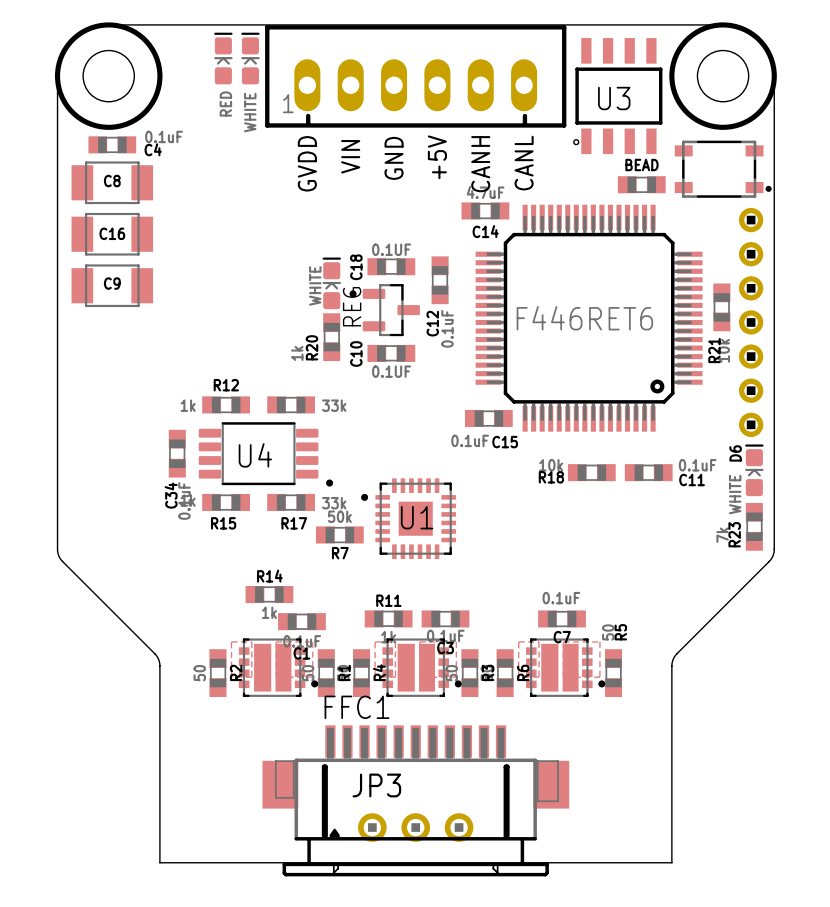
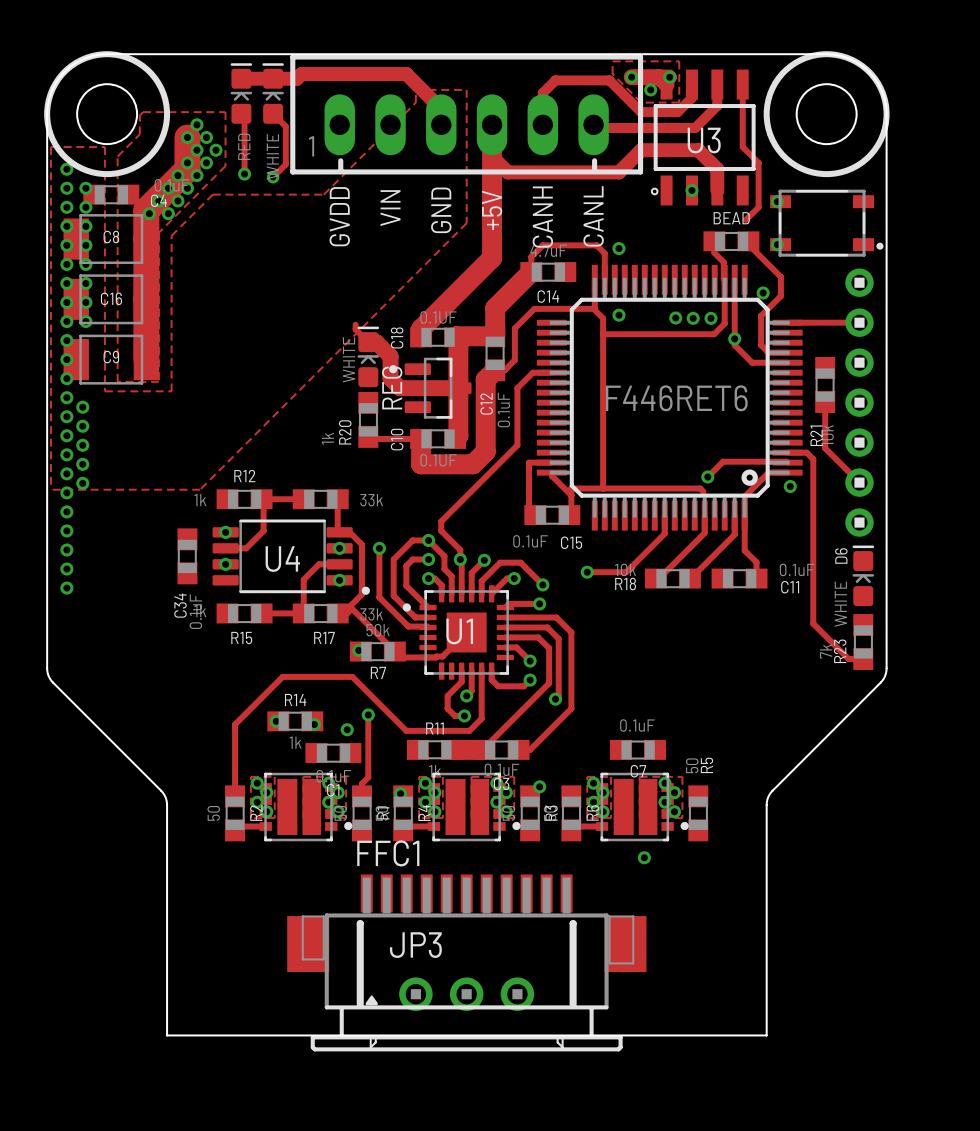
zone outline: none -> (612, 61) (679, 61) (679, 102) (641, 102) (612, 74) (612, 61)
track: none -> (631, 77) (659, 77) (666, 84) (666, 80) (669, 77) (631, 77)
via: none -> (631, 77)
via: none -> (669, 77)
track: none -> (241, 78) (296, 78) (301, 74) (406, 74) (441, 108) (441, 124)
track: none -> (691, 84) (691, 97) (677, 112) (641, 112) (609, 80) (555, 80) (542, 93) (542, 124)
track: none -> (717, 84) (717, 105) (695, 127) (596, 127) (593, 124)
track: none -> (742, 84) (742, 147) (758, 162) (758, 207) (745, 220)
zone outline: none -> (415, 89) (466, 89) (466, 223) (200, 489) (51, 489) (51, 147) (104, 147) (104, 391) (171, 391) (171, 235) (212, 194) (323, 194) (415, 102) (415, 89)
via: none -> (650, 89)
zone outline: none -> (143, 112) (225, 112) (225, 166) (158, 232) (158, 381) (117, 381) (117, 156) (139, 134) (139, 115) (143, 112)
track: none -> (241, 113) (244, 116) (244, 174)
track: none -> (273, 113) (285, 126) (285, 164) (273, 177)
via: none -> (196, 124)
track: none -> (187, 137) (187, 169) (146, 210) (146, 359)
via: none -> (187, 137)
via: none -> (206, 137)
via: none -> (196, 150)
via: none -> (216, 150)
via: none -> (187, 162)
via: none -> (206, 162)
via: none -> (66, 169)
via: none -> (244, 174)
via: none -> (177, 175)
via: none -> (196, 175)
via: none -> (273, 177)
via: none -> (66, 188)
via: none -> (85, 188)
via: none -> (168, 188)
via: none -> (187, 188)
via: none -> (691, 190)
track: none -> (717, 190) (717, 169) (698, 150) (641, 150) (618, 172) (507, 172) (492, 156) (492, 124) (492, 258) (421, 329) (421, 337)
via: none -> (158, 200)
via: none -> (177, 200)
via: none -> (777, 201)
via: none -> (66, 207)
via: none -> (85, 207)
via: none -> (149, 213)
via: none -> (168, 213)
via: none -> (66, 226)
via: none -> (85, 226)
track: none -> (714, 241) (714, 252) (723, 262) (724, 323) (714, 334) (603, 334)
track: none -> (748, 241) (748, 244) (780, 277) (780, 296) (761, 315) (761, 345) (768, 352) (787, 352)
via: none -> (777, 244)
via: none -> (66, 245)
via: none -> (85, 245)
via: none -> (618, 248)
via: none -> (66, 264)
via: none -> (85, 264)
track: none -> (594, 279) (594, 308) (534, 308) (514, 328) (514, 360) (504, 370) (495, 370) (485, 379) (485, 451) (473, 464) (421, 464) (421, 438) (370, 438) (368, 436)
track: none -> (604, 279) (604, 253) (596, 245) (542, 245) (531, 256) (531, 272) (495, 308) (495, 336) (455, 337) (458, 340) (458, 435) (455, 438)
track: none -> (734, 279) (734, 345) (752, 362) (787, 362)
via: none -> (66, 283)
via: none -> (85, 283)
via: none -> (763, 292)
via: none -> (66, 302)
via: none -> (85, 302)
track: none -> (594, 310) (603, 318) (603, 488)
via: none -> (618, 315)
via: none -> (675, 318)
via: none -> (693, 318)
via: none -> (710, 318)
via: none -> (66, 321)
via: none -> (85, 321)
track: none -> (789, 322) (859, 322)
track: none -> (355, 324) (355, 329) (368, 342) (376, 342) (390, 356) (390, 378) (400, 388) (458, 388)
via: none -> (734, 338)
via: none -> (66, 340)
via: none -> (66, 359)
track: none -> (551, 372) (532, 372) (517, 388) (517, 445) (441, 521) (441, 530) (460, 549) (461, 593)
via: none -> (66, 378)
via: none -> (66, 397)
track: none -> (825, 401) (825, 448) (859, 482)
via: none -> (82, 407)
via: none -> (66, 416)
via: none -> (82, 426)
via: none -> (66, 435)
via: none -> (82, 445)
track: none -> (787, 452) (806, 452) (813, 459) (813, 623) (848, 659) (863, 659)
via: none -> (66, 454)
track: none -> (551, 462) (529, 462) (529, 508) (535, 515)
track: none -> (787, 462) (723, 461) (707, 477)
via: none -> (82, 464)
track: none -> (551, 472) (551, 475) (571, 495)
track: none -> (787, 472) (768, 472) (744, 496) (744, 550) (756, 562) (756, 578)
via: none -> (66, 473)
via: none -> (707, 477)
via: none -> (82, 483)
via: none -> (790, 486)
track: none -> (703, 491) (700, 488) (571, 488) (571, 513) (569, 515)
via: none -> (66, 492)
track: none -> (261, 499) (303, 499)
track: none -> (263, 499) (263, 530) (246, 548) (225, 548)
track: none -> (337, 499) (337, 530) (339, 532) (349, 532) (361, 544) (361, 594) (342, 613)
via: none -> (66, 511)
track: none -> (664, 515) (664, 533) (626, 572) (587, 572)
track: none -> (704, 515) (704, 532) (659, 578) (655, 578)
track: none -> (734, 515) (734, 534) (690, 578)
via: none -> (66, 530)
via: none -> (225, 532)
via: none -> (428, 540)
via: none -> (339, 548)
track: none -> (379, 548) (379, 597) (408, 626) (428, 627)
via: none -> (379, 548)
via: none -> (66, 549)
track: none -> (428, 559) (412, 559) (406, 565) (406, 585) (428, 607)
via: none -> (428, 559)
via: none -> (460, 559)
track: none -> (484, 560) (471, 573) (471, 593)
via: none -> (484, 560)
via: none -> (225, 564)
track: none -> (339, 564) (319, 564) (303, 579) (303, 613) (261, 613)
via: none -> (66, 569)
via: none -> (587, 572)
track: none -> (428, 578) (434, 578) (441, 585) (441, 593)
via: none -> (428, 578)
track: none -> (514, 578) (506, 578) (491, 593)
via: none -> (514, 578)
via: none -> (339, 580)
track: none -> (542, 584) (520, 562) (500, 562) (481, 581) (481, 593)
via: none -> (542, 584)
via: none -> (66, 588)
track: none -> (451, 593) (451, 576) (444, 569) (444, 556) (428, 540) (412, 540) (393, 559) (393, 595) (415, 617) (428, 617)
track: none -> (539, 603) (508, 603) (505, 607)
via: none -> (539, 603)
track: none -> (337, 613) (347, 613) (351, 608) (400, 657) (442, 656) (466, 632)
track: none -> (505, 617) (556, 617) (571, 632) (571, 708) (530, 749) (518, 749)
track: none -> (505, 627) (547, 627) (558, 638) (558, 695) (555, 699)
track: none -> (505, 637) (538, 637) (549, 648) (549, 683) (482, 749) (451, 749) (484, 749)
track: none -> (505, 647) (516, 647) (530, 661)
via: none -> (358, 650)
via: none -> (530, 661)
track: none -> (461, 671) (461, 681) (447, 695) (447, 708) (454, 715) (464, 715)
track: none -> (471, 671) (471, 690) (466, 695)
track: none -> (481, 671) (481, 718) (469, 730) (406, 730) (352, 676) (282, 676) (235, 724) (235, 796)
track: none -> (491, 671) (491, 679) (498, 686) (523, 686) (530, 680)
via: none -> (530, 680)
via: none -> (466, 695)
via: none -> (555, 699)
track: none -> (368, 714) (368, 777) (361, 783) (361, 796)
via: none -> (368, 714)
via: none -> (464, 715)
via: none -> (276, 721)
via: none -> (314, 724)
via: none -> (347, 729)
via: none -> (257, 783)
via: none -> (328, 783)
via: none -> (425, 783)
via: none -> (496, 783)
via: none -> (593, 783)
via: none -> (664, 783)
via: none -> (539, 786)
via: none -> (266, 792)
via: none -> (338, 792)
via: none -> (434, 792)
via: none -> (506, 792)
via: none -> (603, 792)
via: none -> (674, 792)
via: none -> (400, 793)
via: none -> (257, 802)
via: none -> (328, 802)
via: none -> (425, 802)
via: none -> (496, 802)
via: none -> (593, 802)
via: none -> (664, 802)
via: none -> (266, 811)
via: none -> (338, 811)
via: none -> (434, 811)
via: none -> (506, 811)
via: none -> (603, 811)
via: none -> (674, 811)
track: none -> (265, 826) (238, 826) (235, 830)
track: none -> (433, 826) (407, 826) (403, 830)
track: none -> (602, 826) (575, 826) (571, 830)
via: none -> (644, 857)

